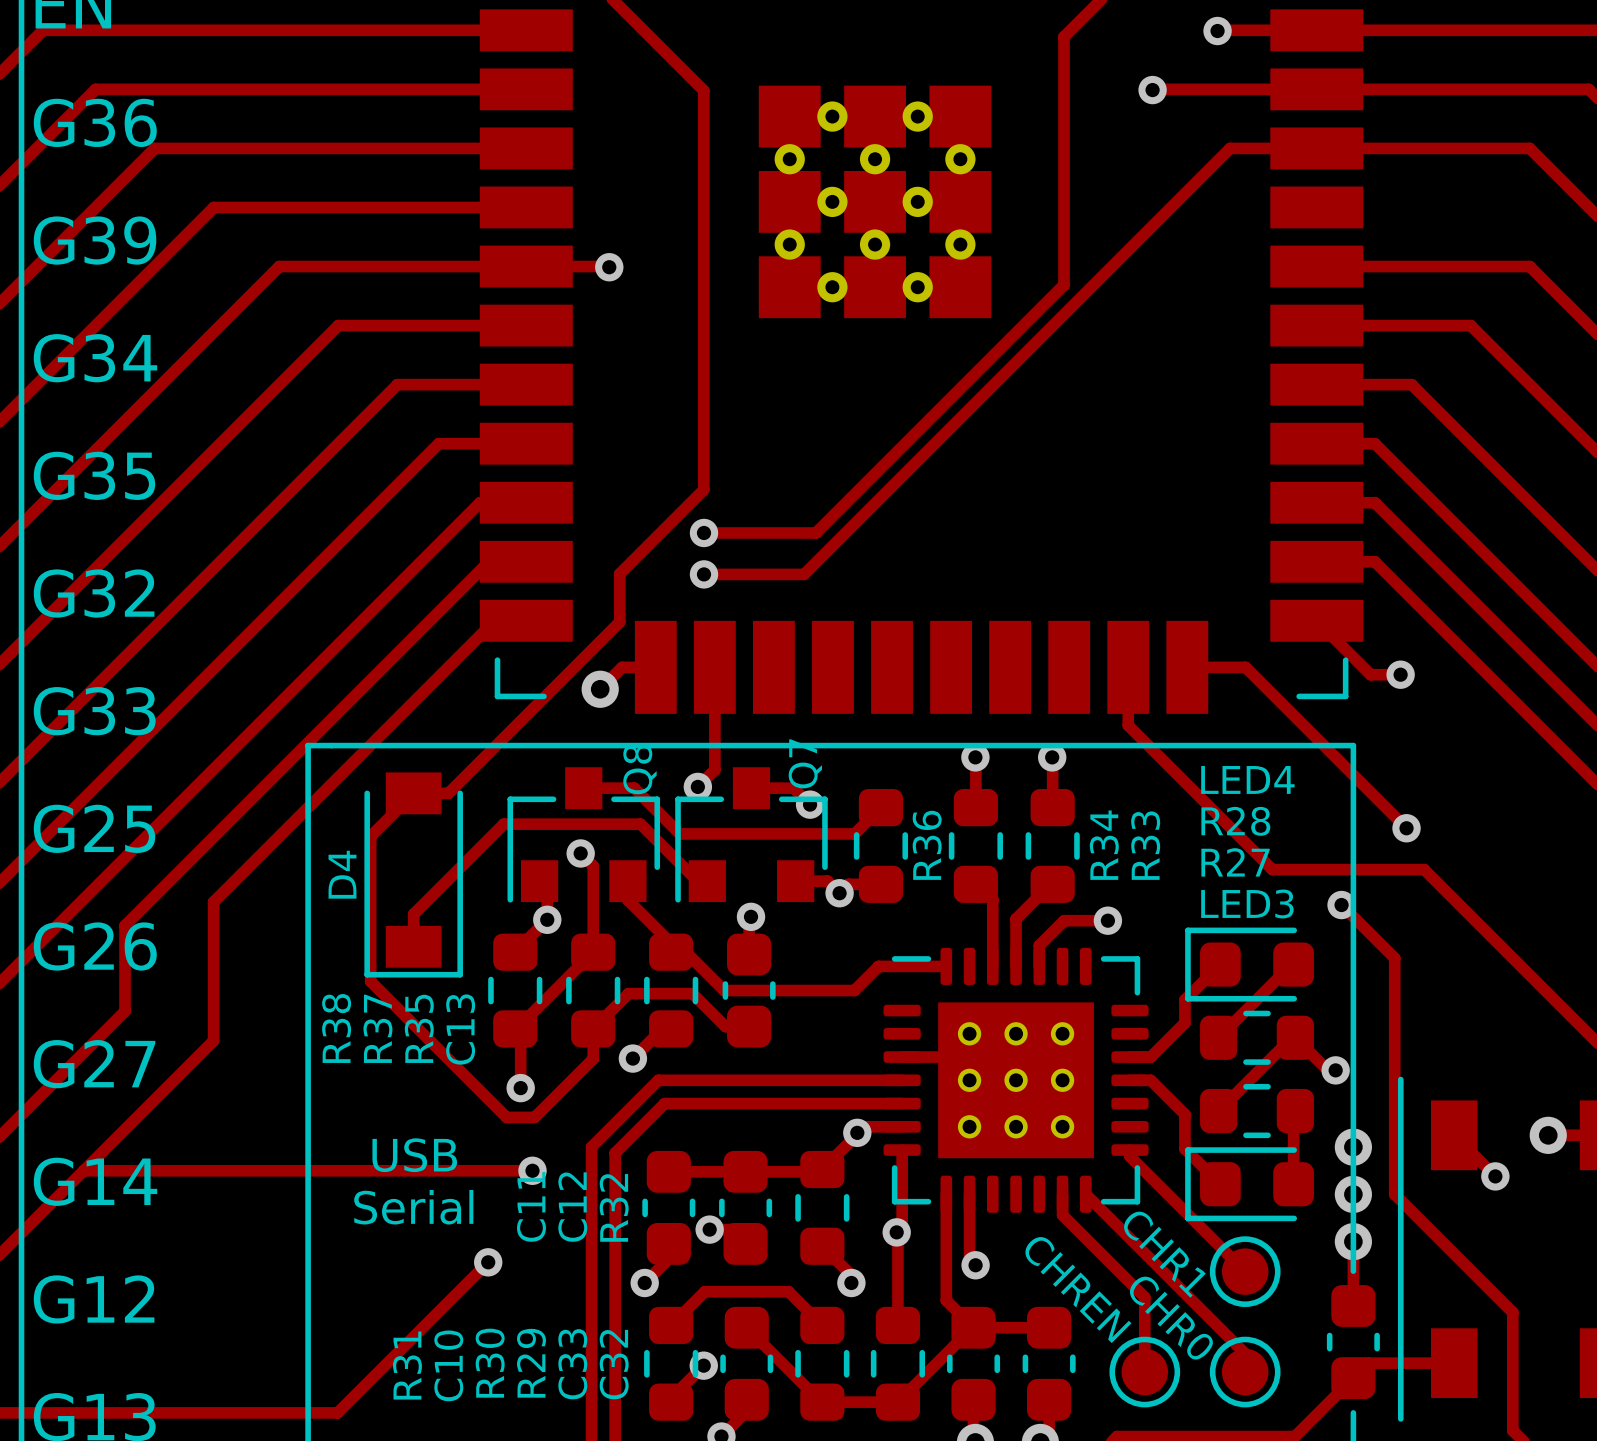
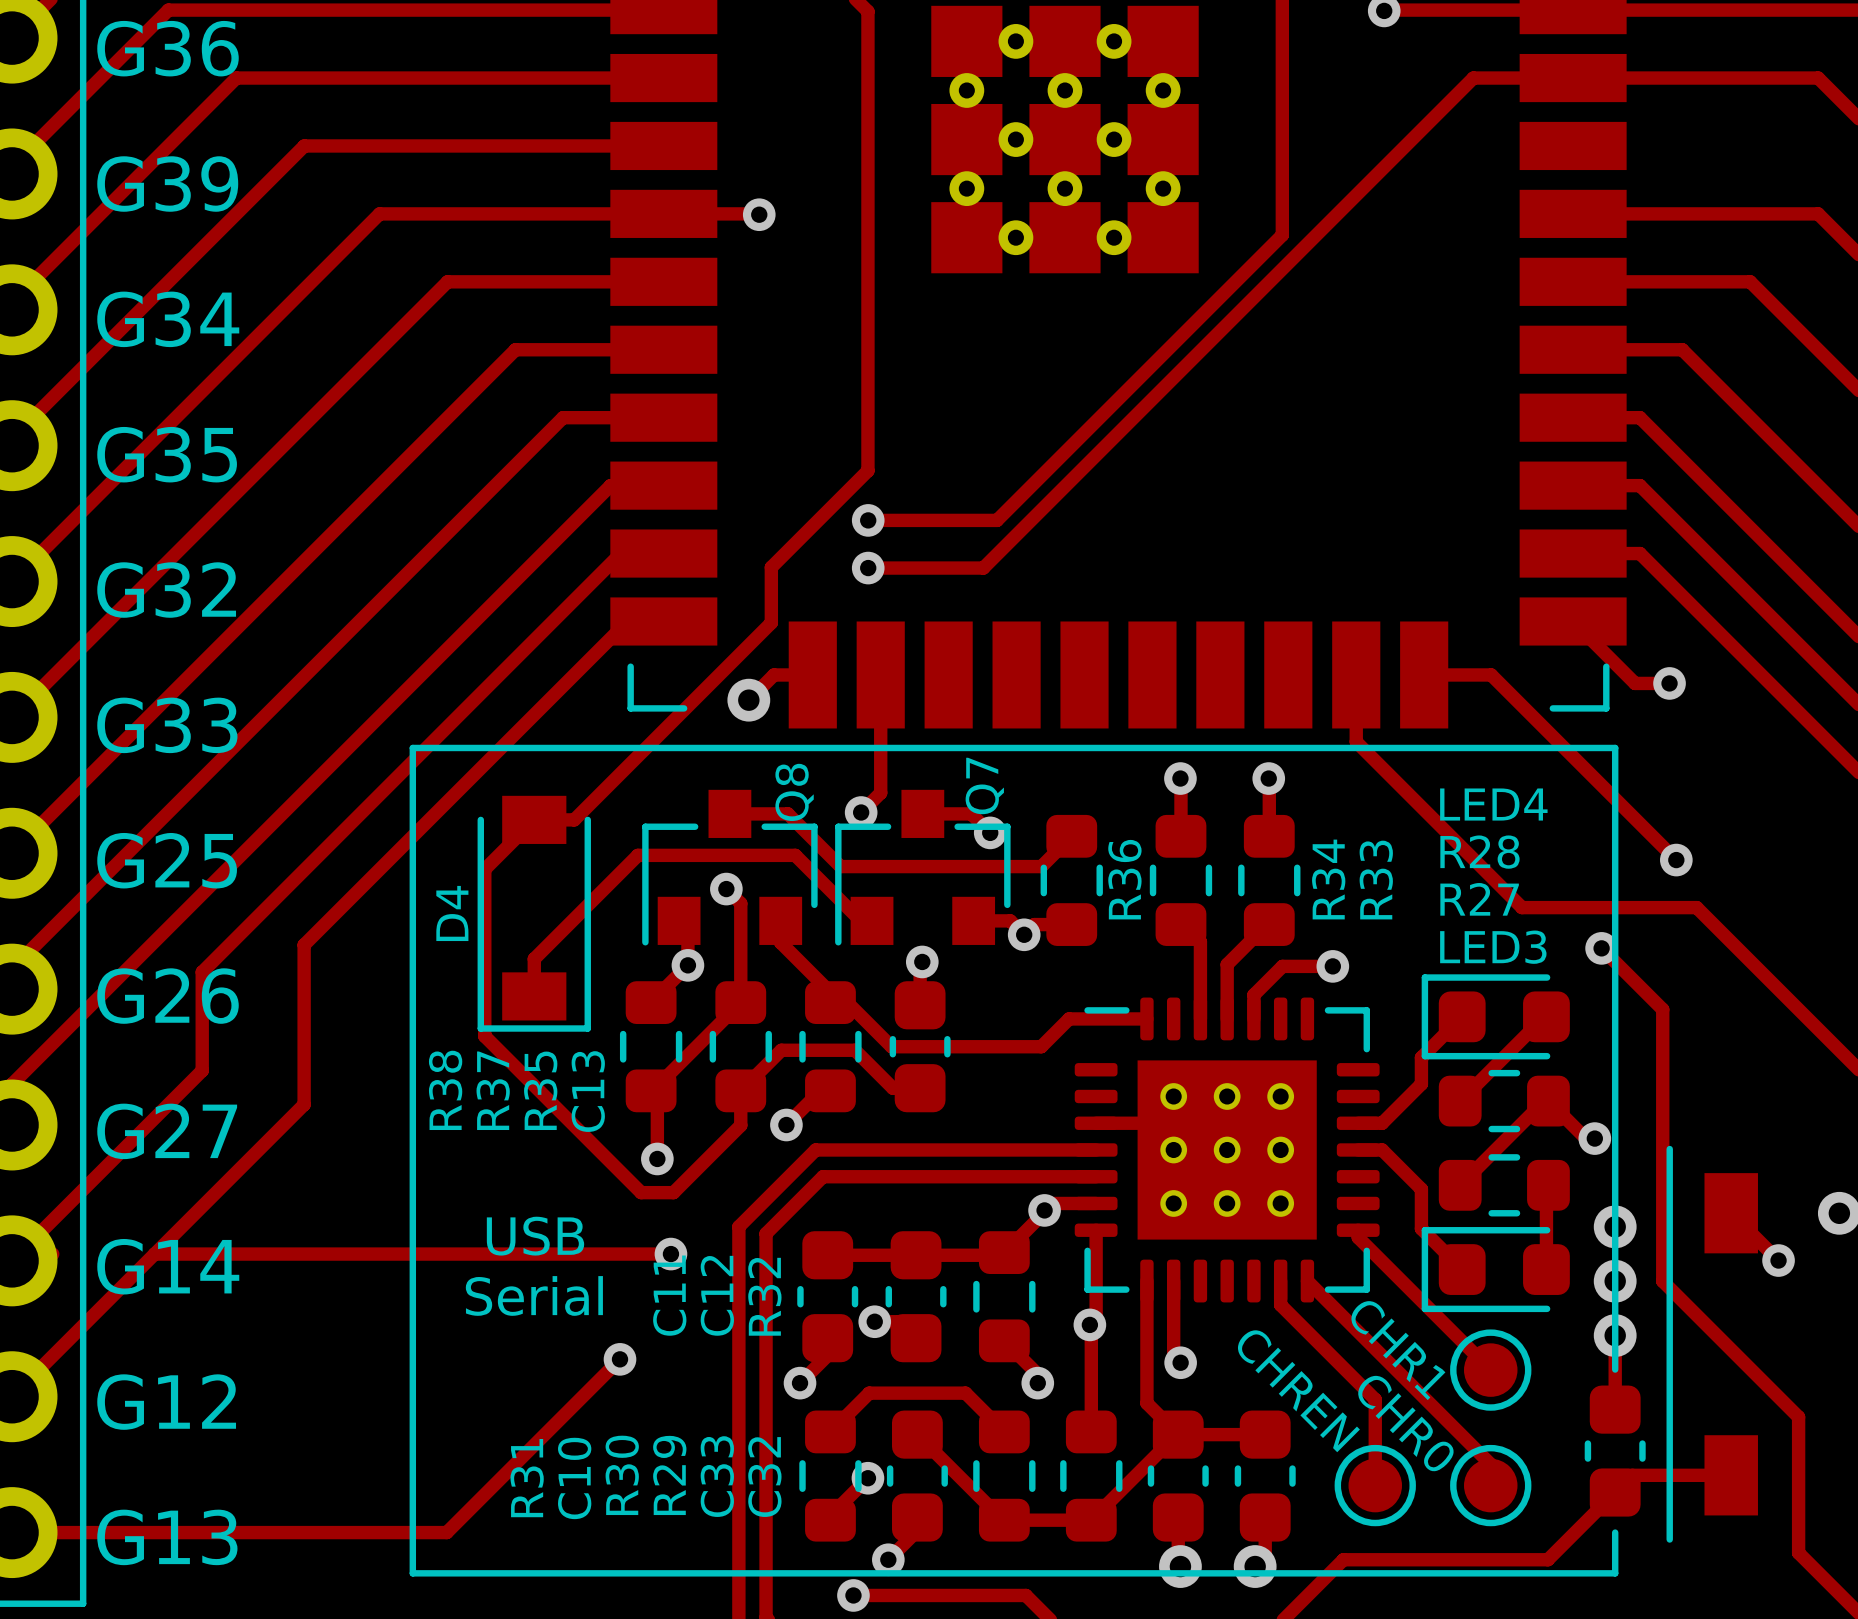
line: (308, 745) (1353, 745) -> (412, 764) (412, 747) (1615, 747) (1615, 764)

